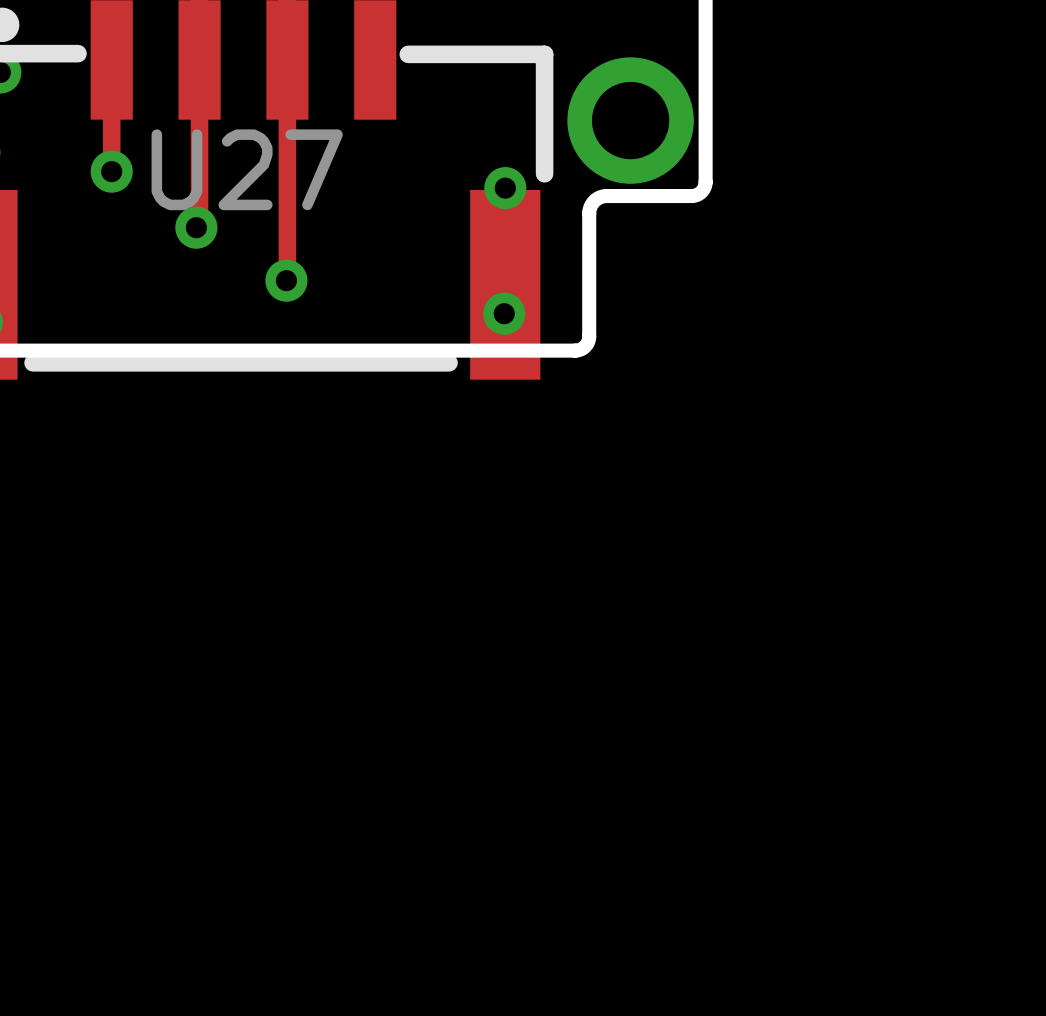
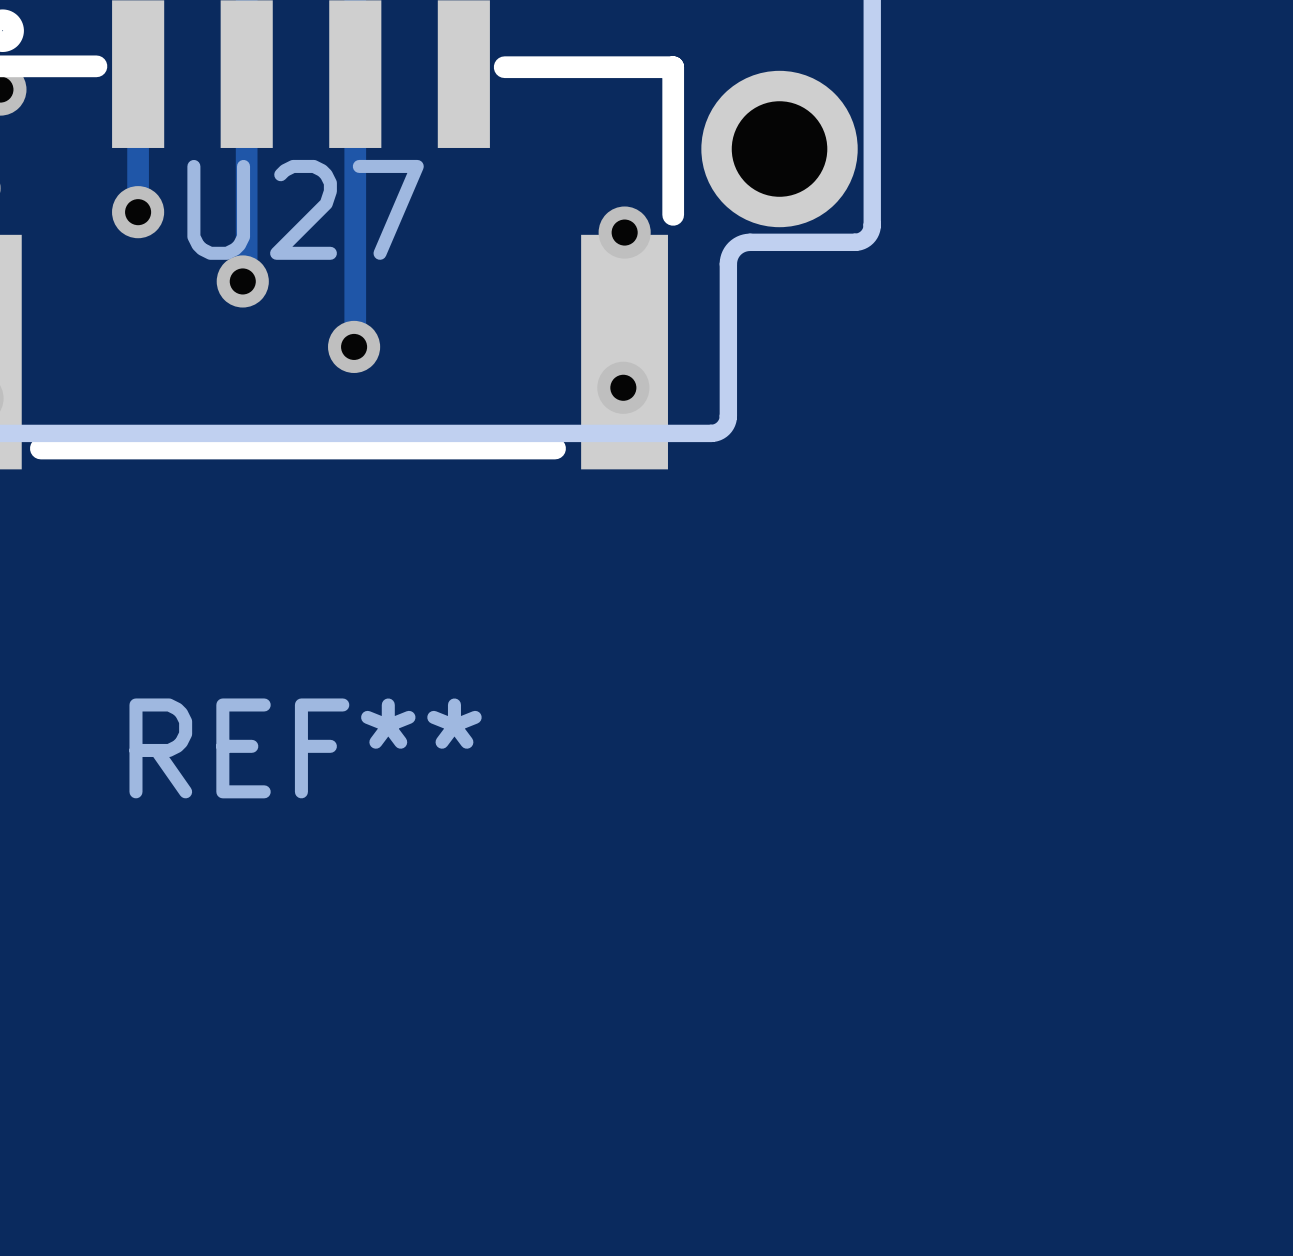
U27 text: none -> REF** (305, 748)

